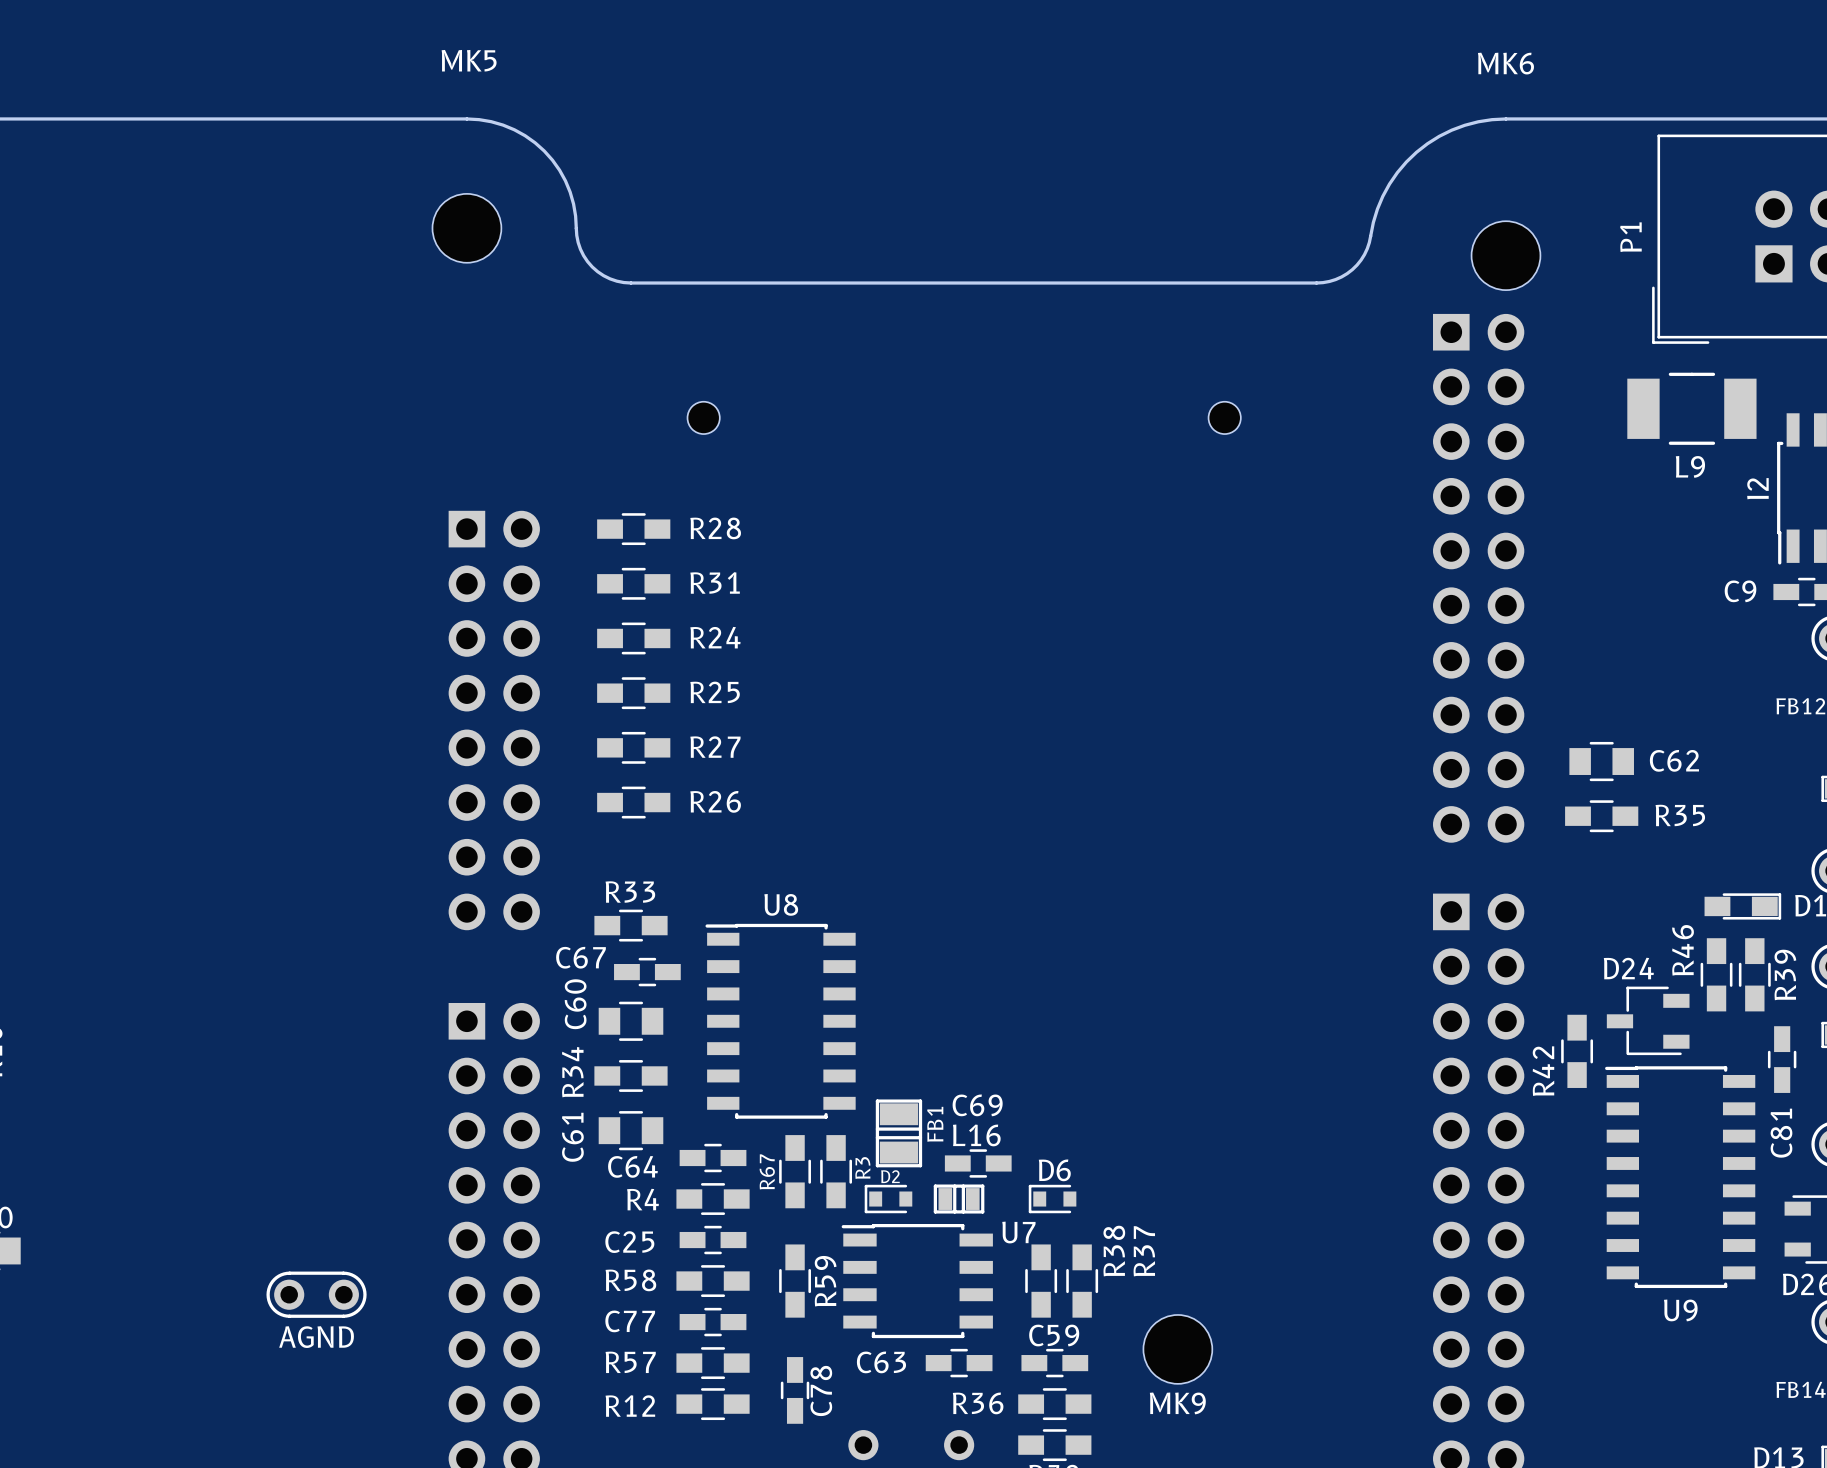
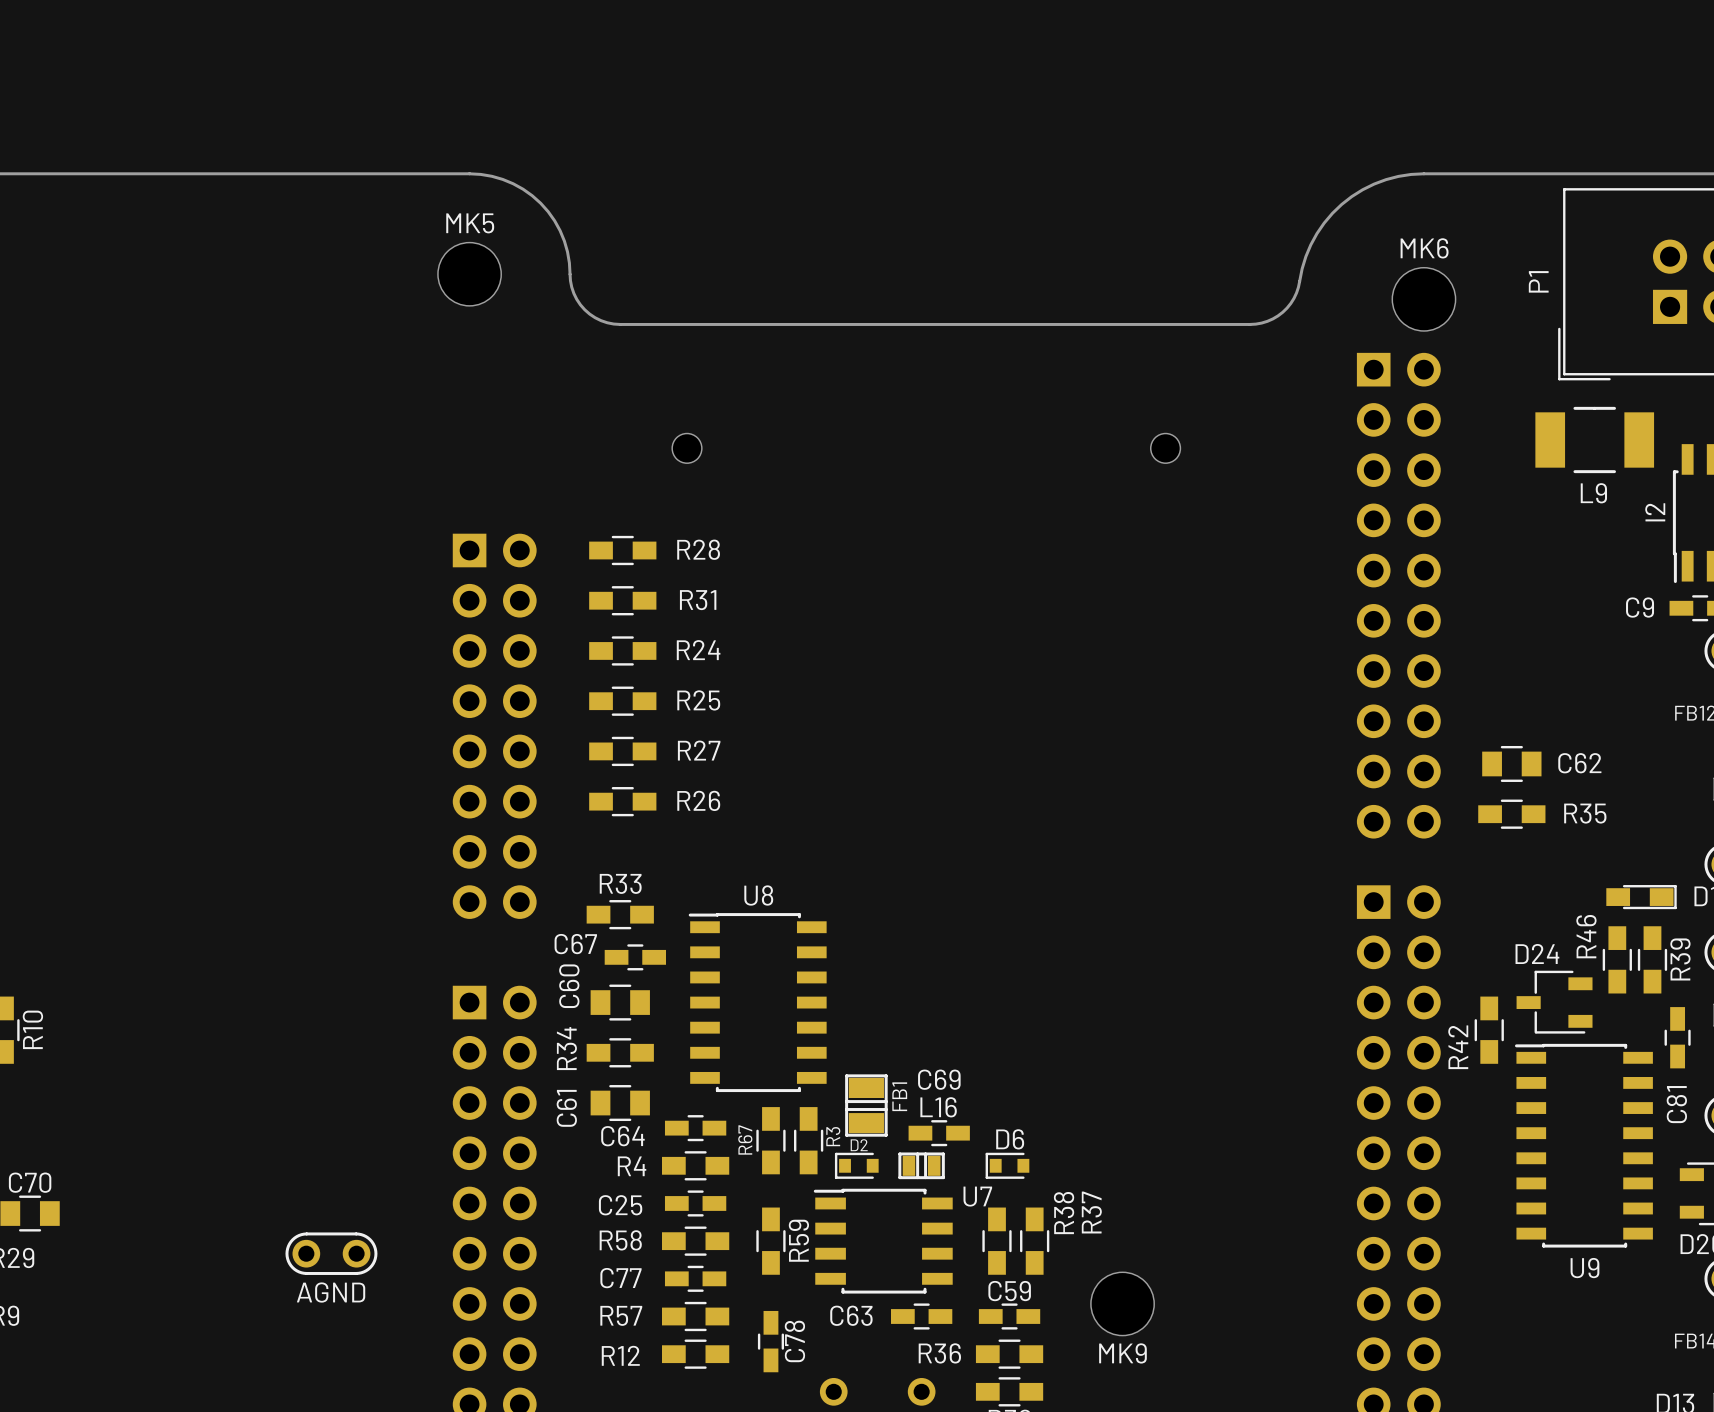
MK5 name position: MK5 (469, 60) -> MK5 (470, 223)
MK6 name position: MK6 (1505, 63) -> MK6 (1424, 248)

